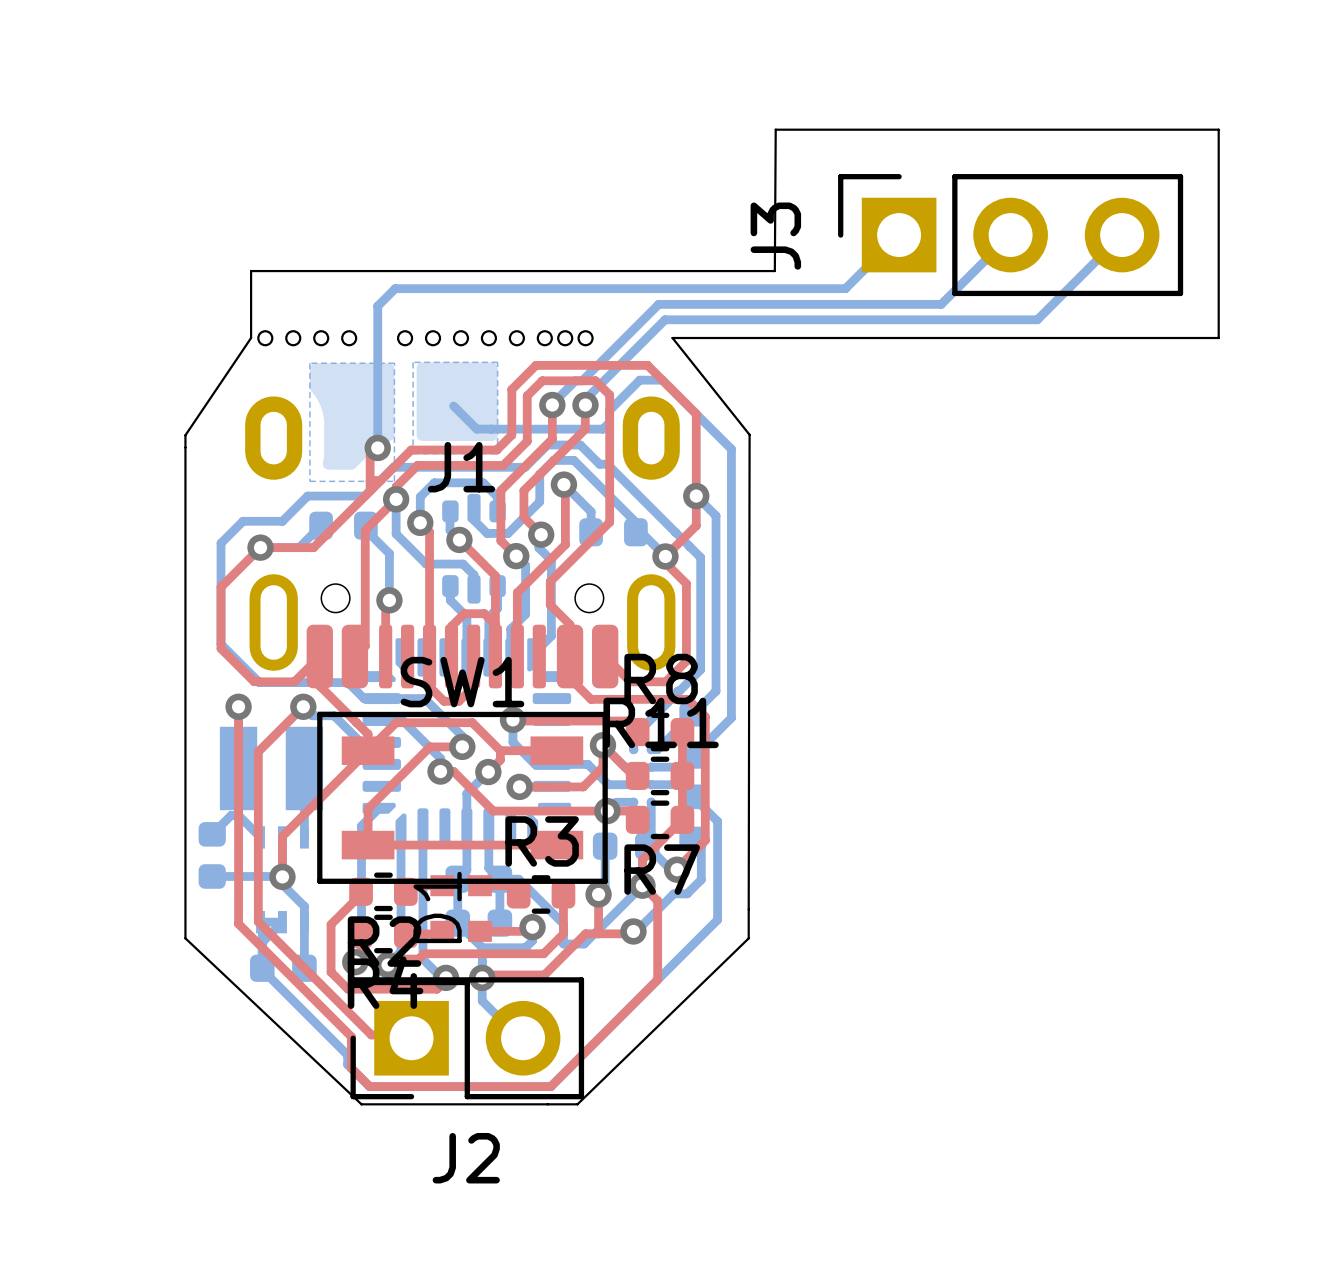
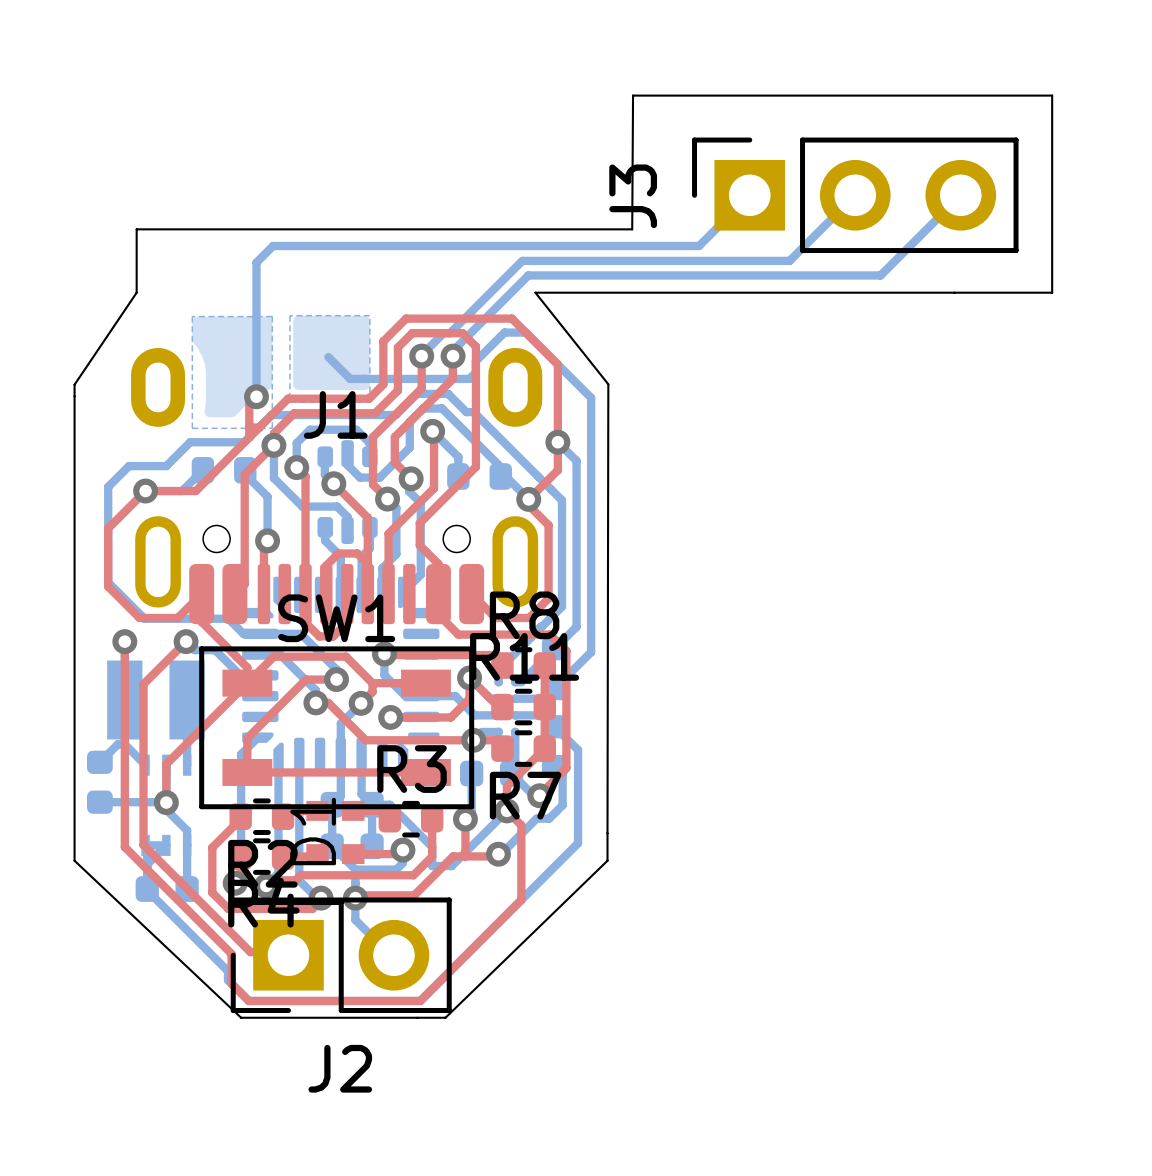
round board edge: [257, 330, 274, 347] -> none
round board edge: [285, 330, 302, 347] -> none
round board edge: [313, 330, 330, 347] -> none
round board edge: [341, 330, 358, 347] -> none
round board edge: [396, 330, 414, 347] -> none
round board edge: [424, 330, 442, 347] -> none
round board edge: [452, 330, 470, 347] -> none
round board edge: [480, 330, 498, 347] -> none
round board edge: [508, 330, 525, 347] -> none
round board edge: [536, 330, 553, 347] -> none
round board edge: [557, 330, 574, 347] -> none
round board edge: [577, 330, 594, 347] -> none

